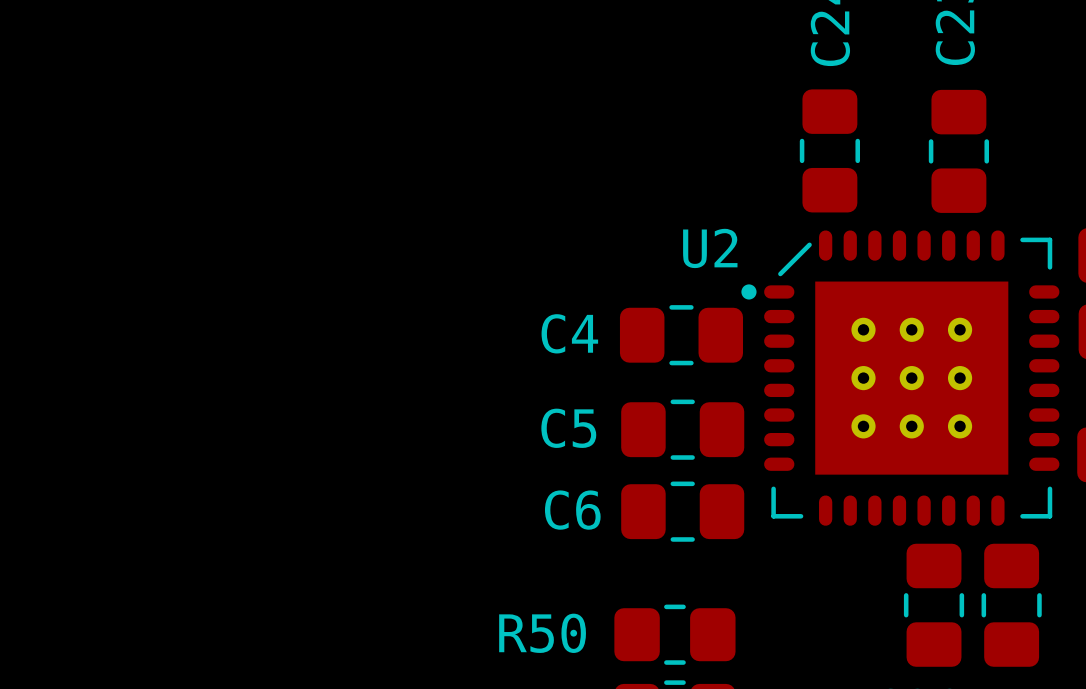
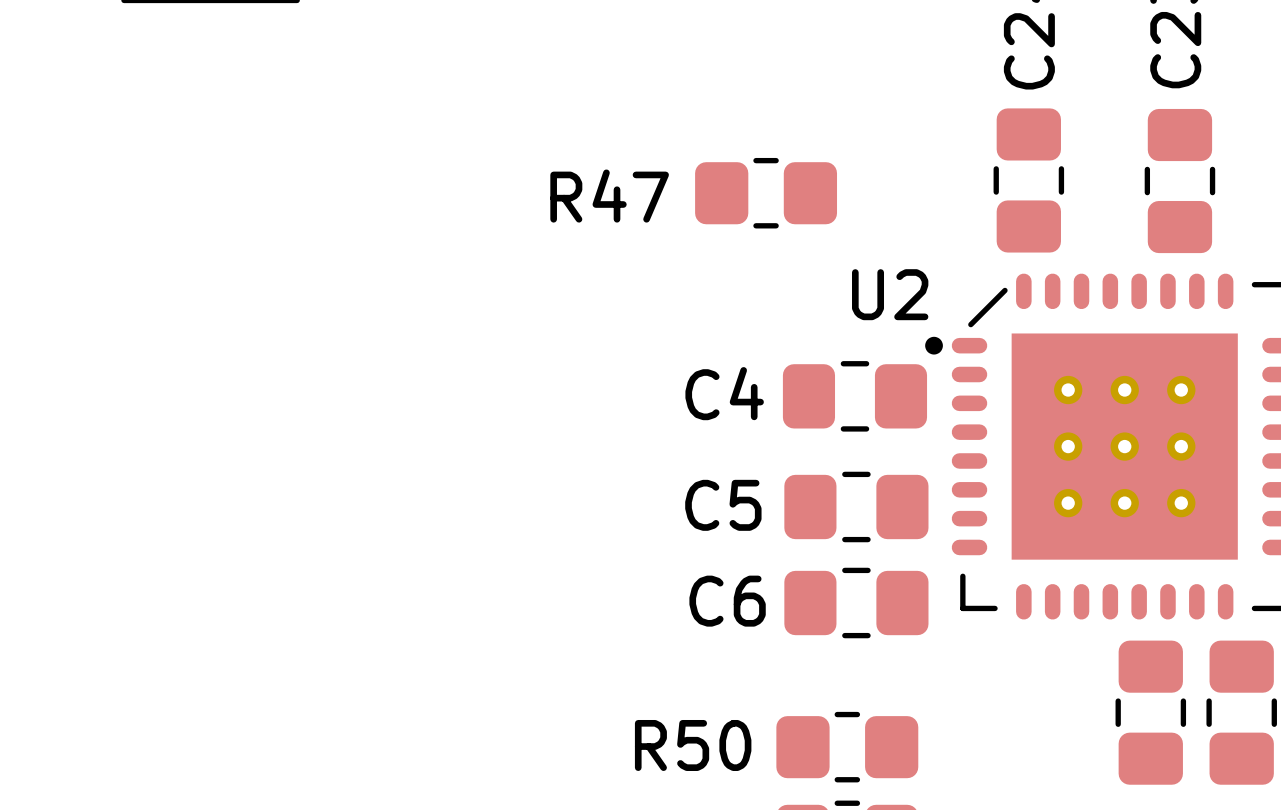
R47: none -> (766, 193)

